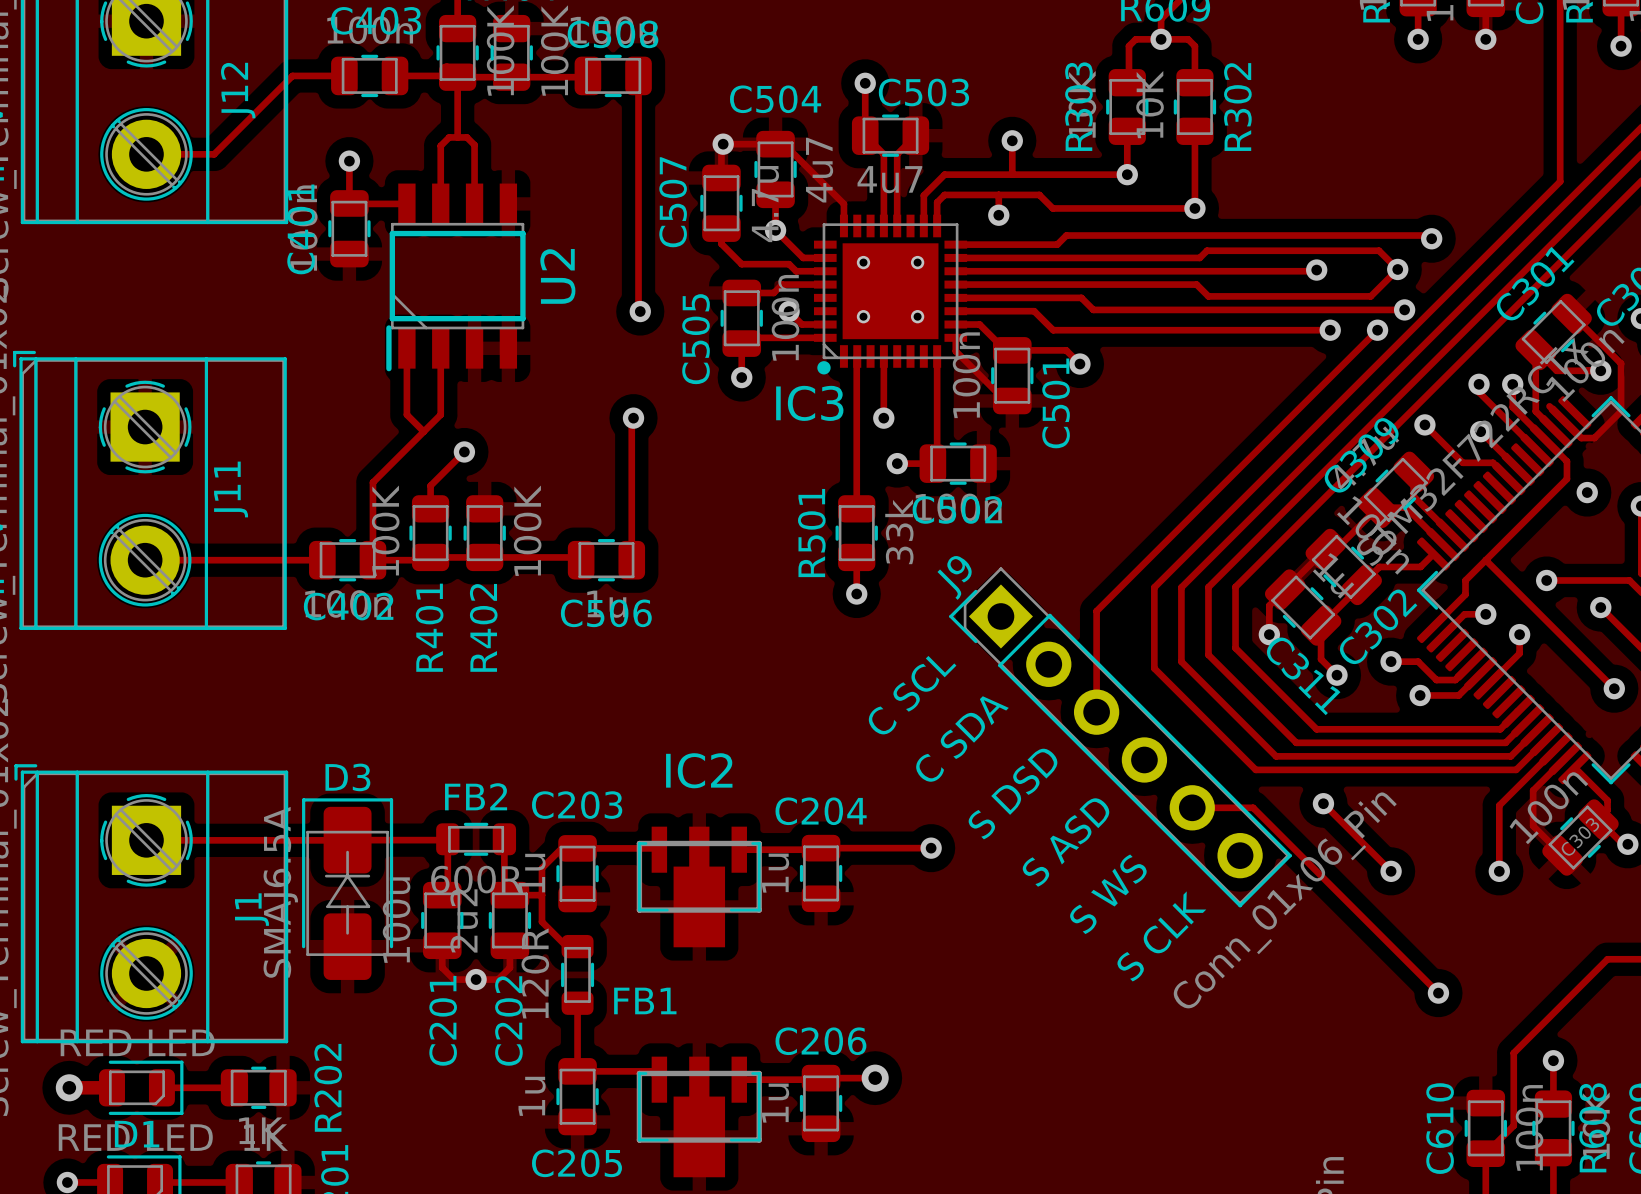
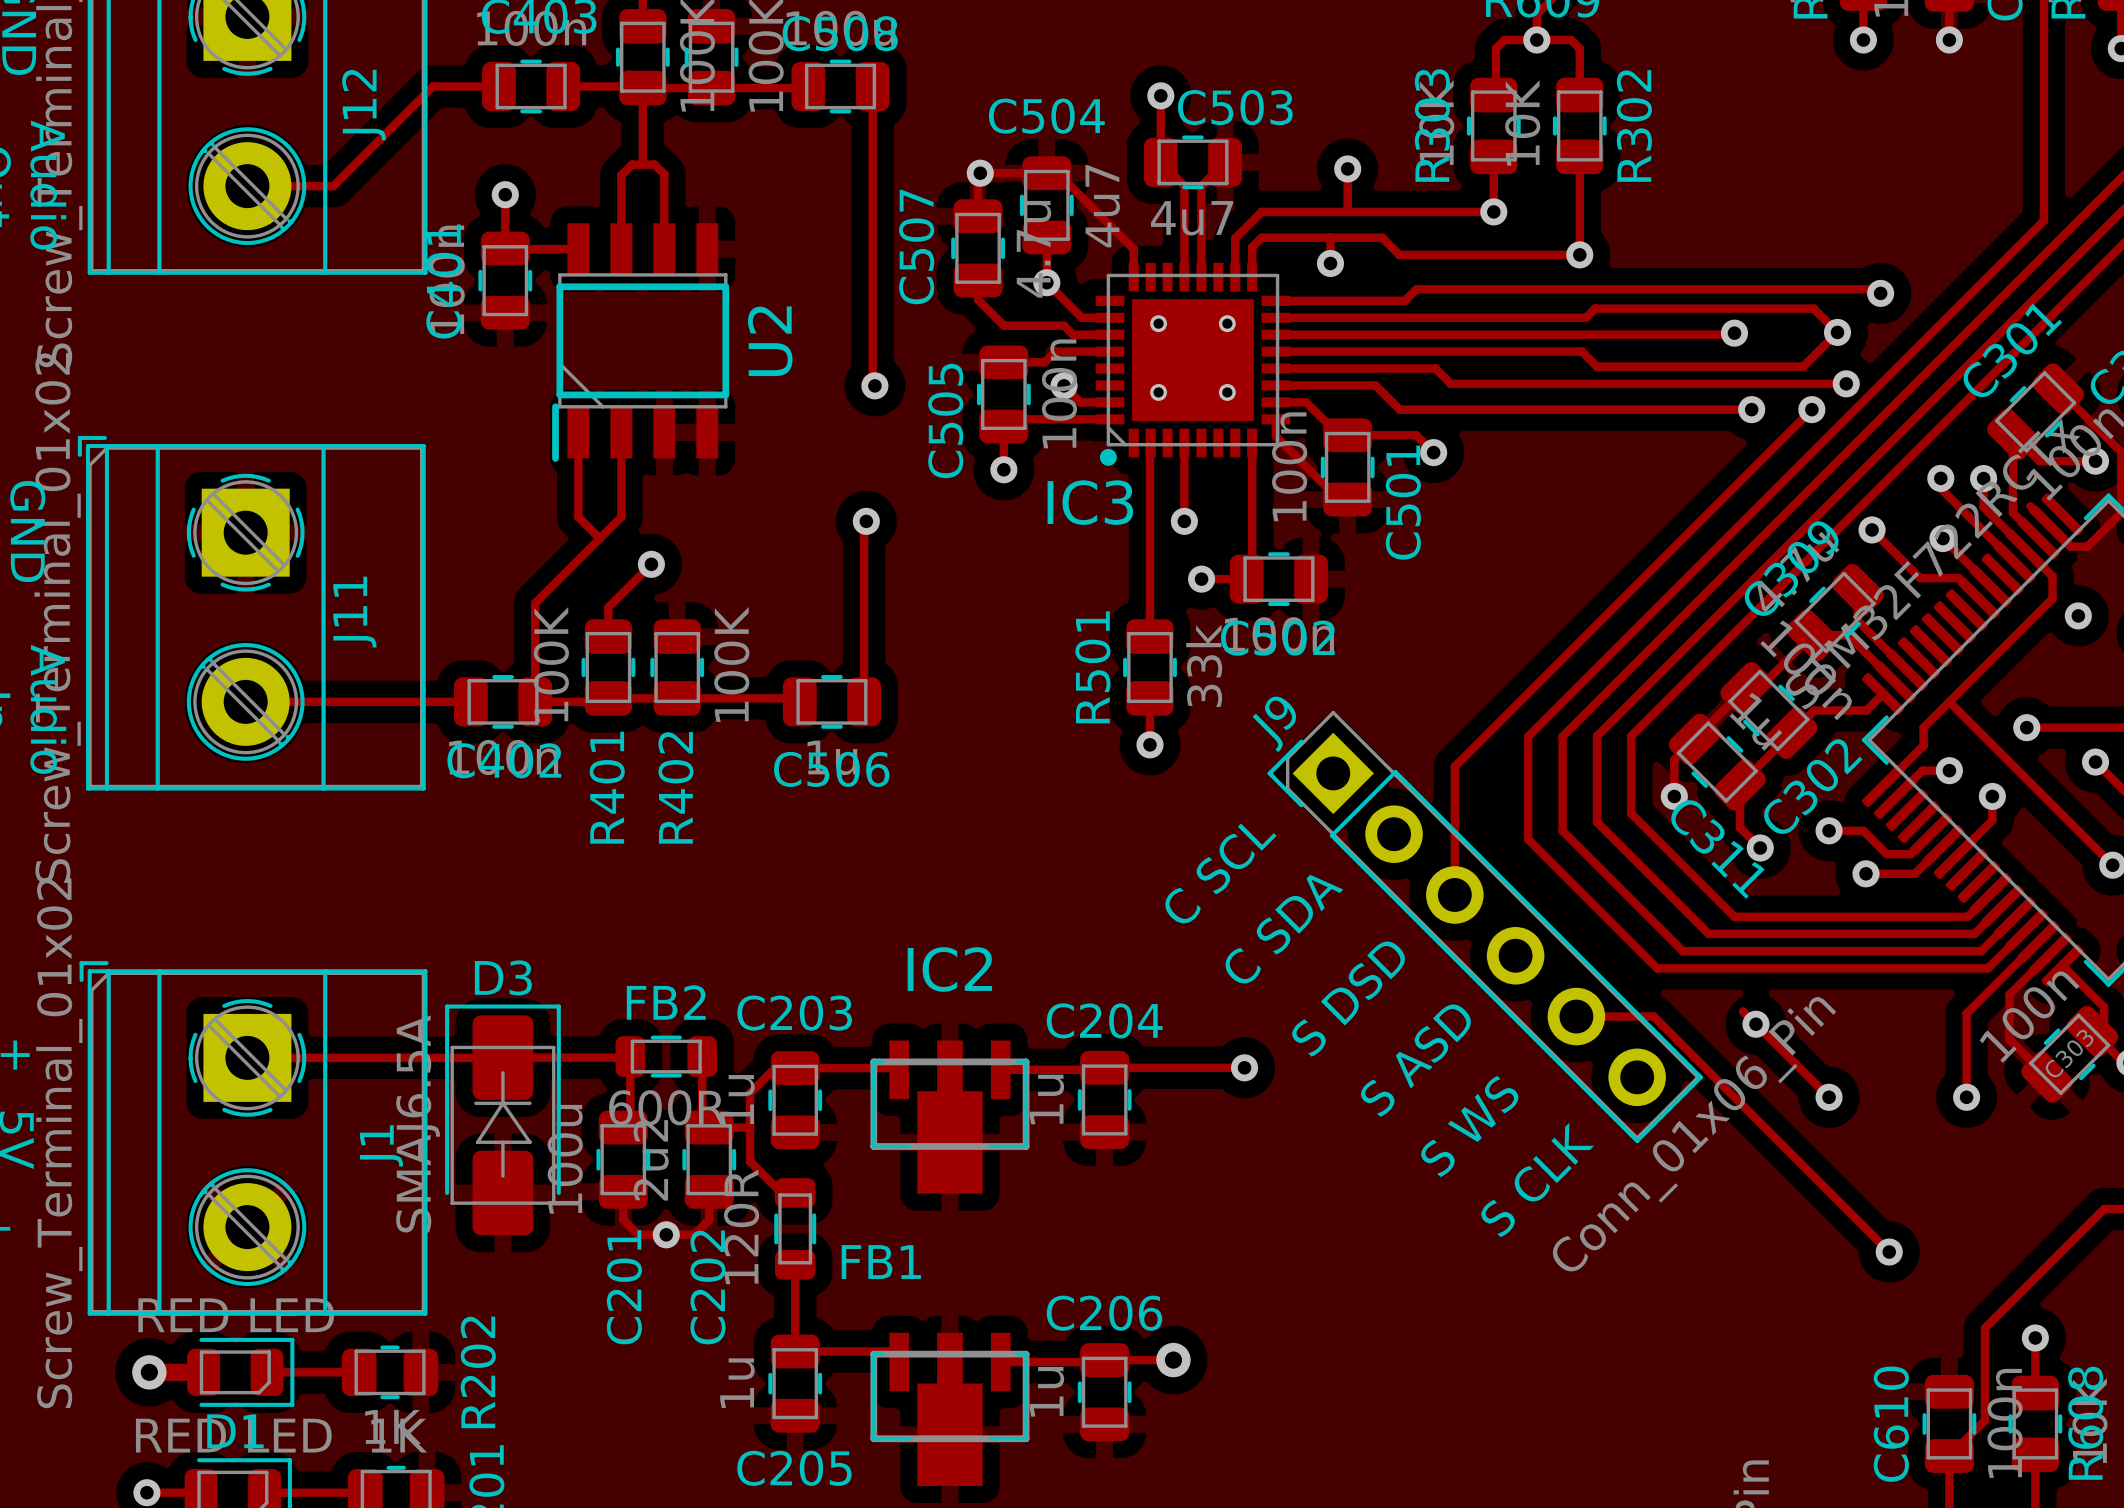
via position: (1323, 803) -> (1755, 1024)

